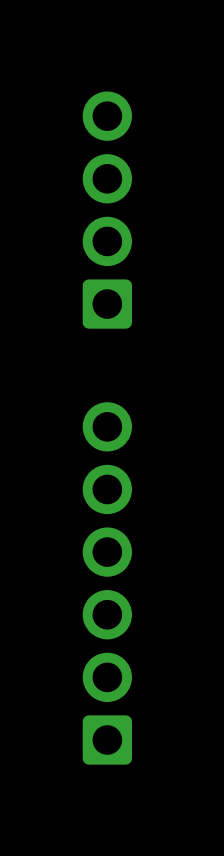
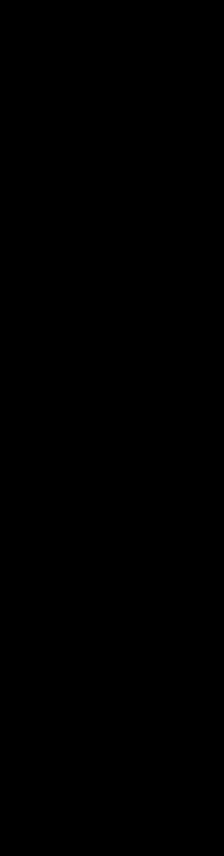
part: (107, 210) -> none
part: (107, 583) -> none

